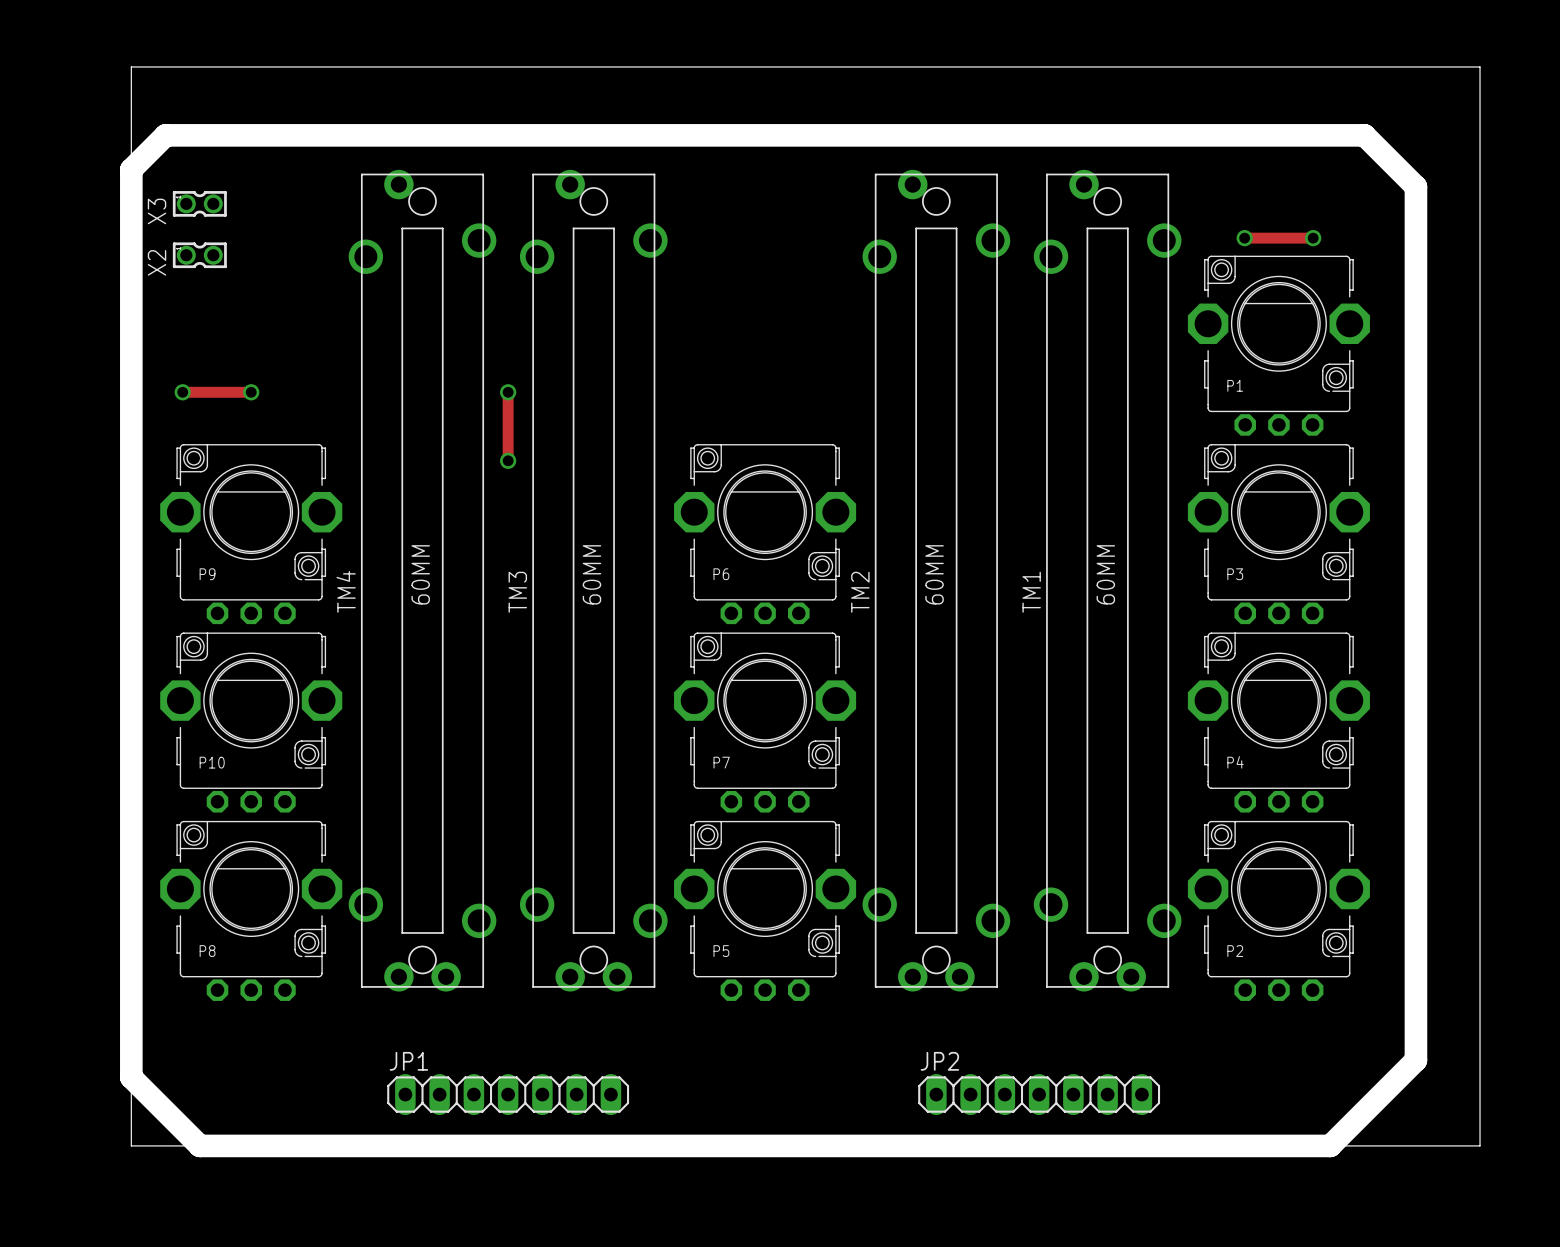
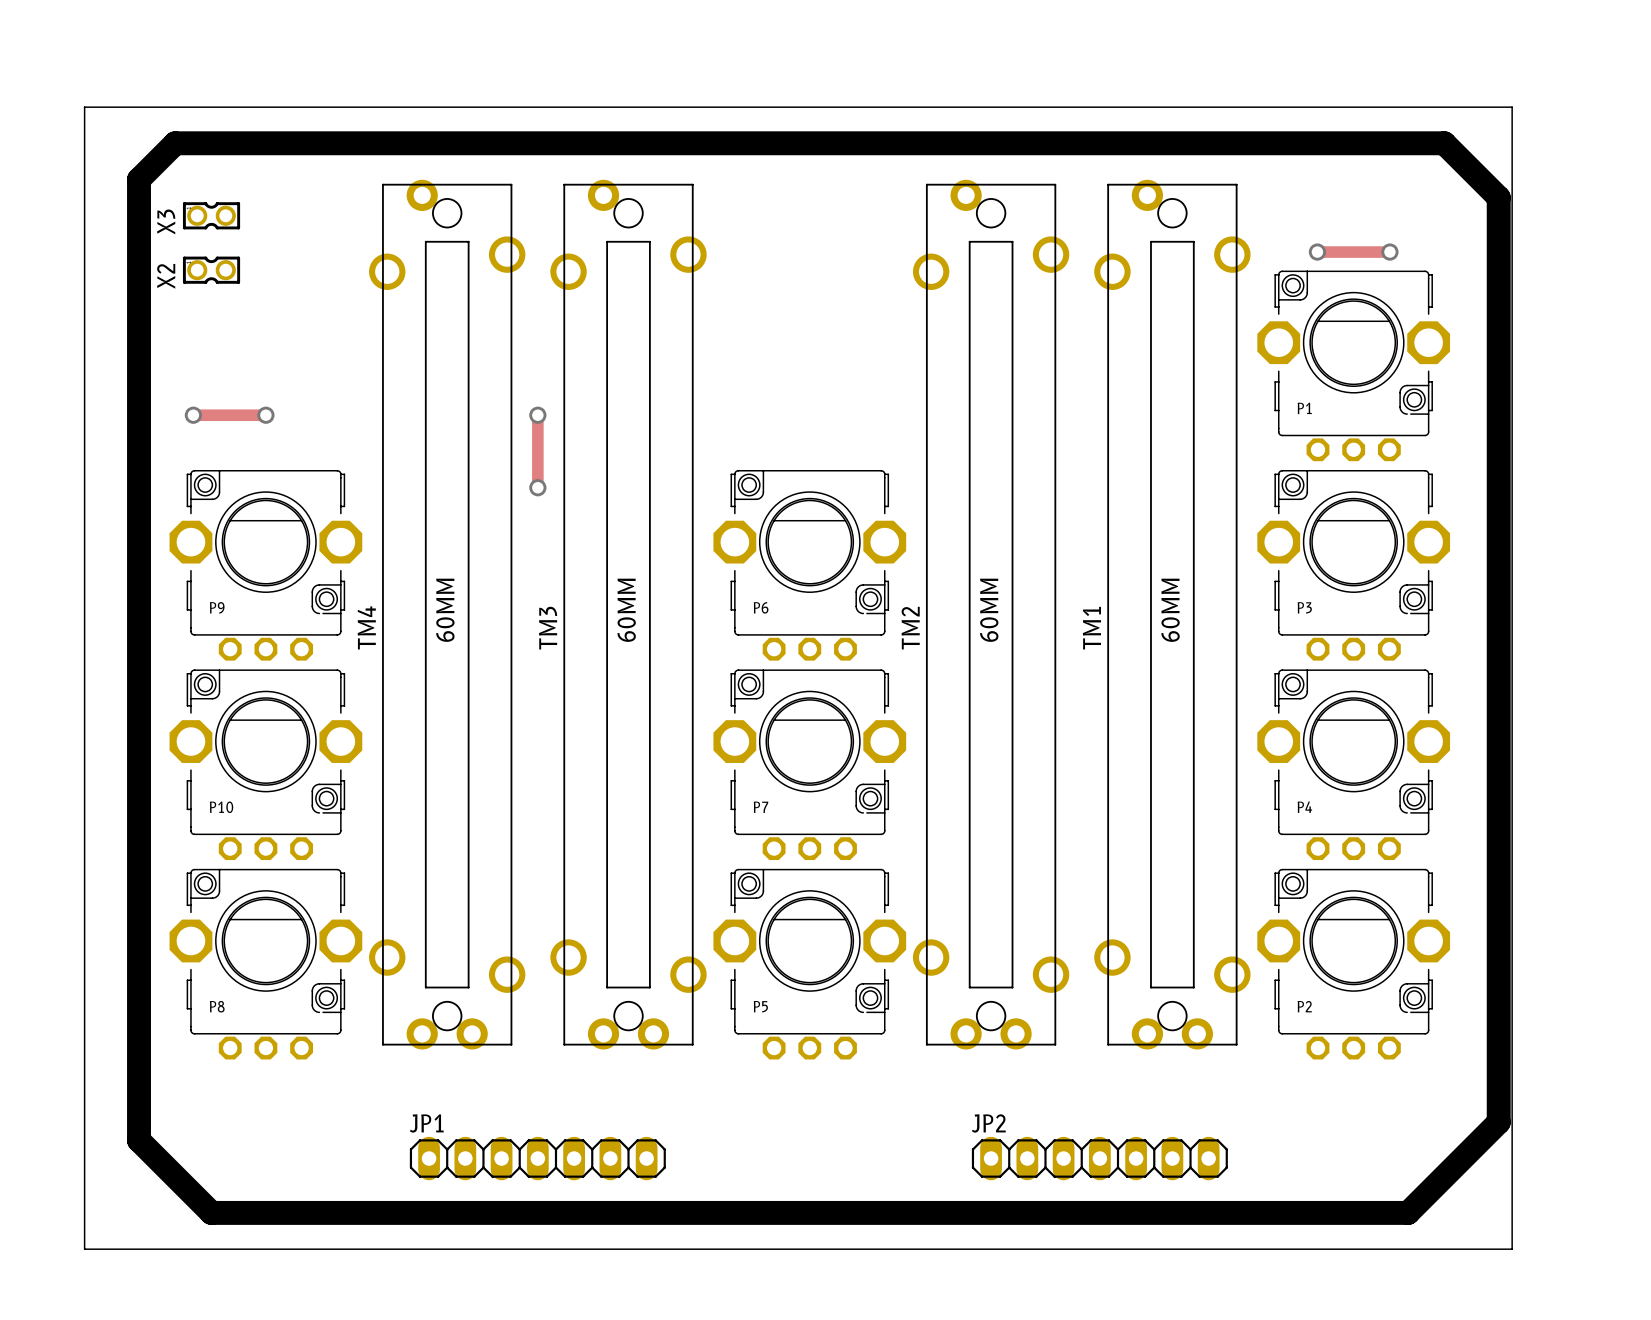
board edge: (131, 66) (1480, 66) (1480, 1145) (131, 1145) (131, 66) -> (84, 107) (84, 1249) (1512, 1249) (1512, 107) (84, 107)

